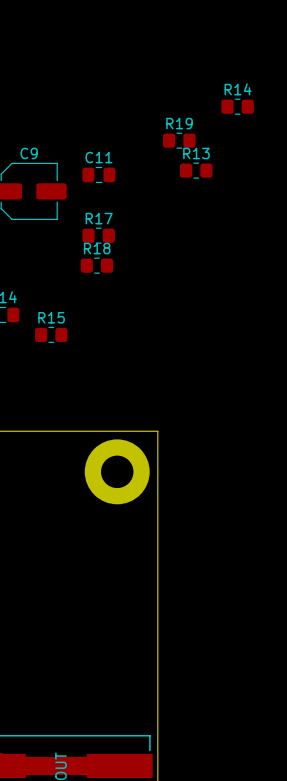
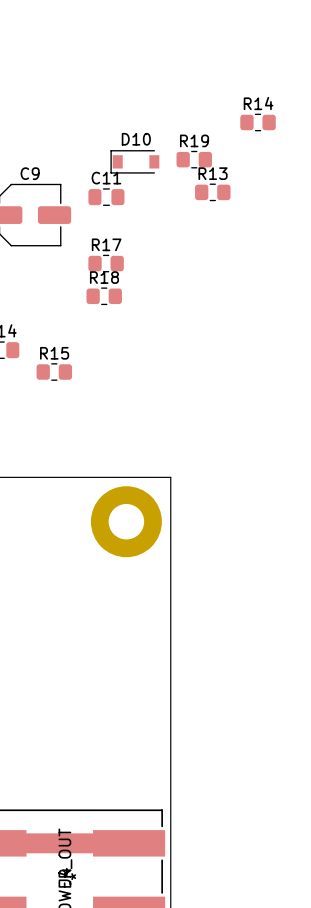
D10: none -> (134, 161)

